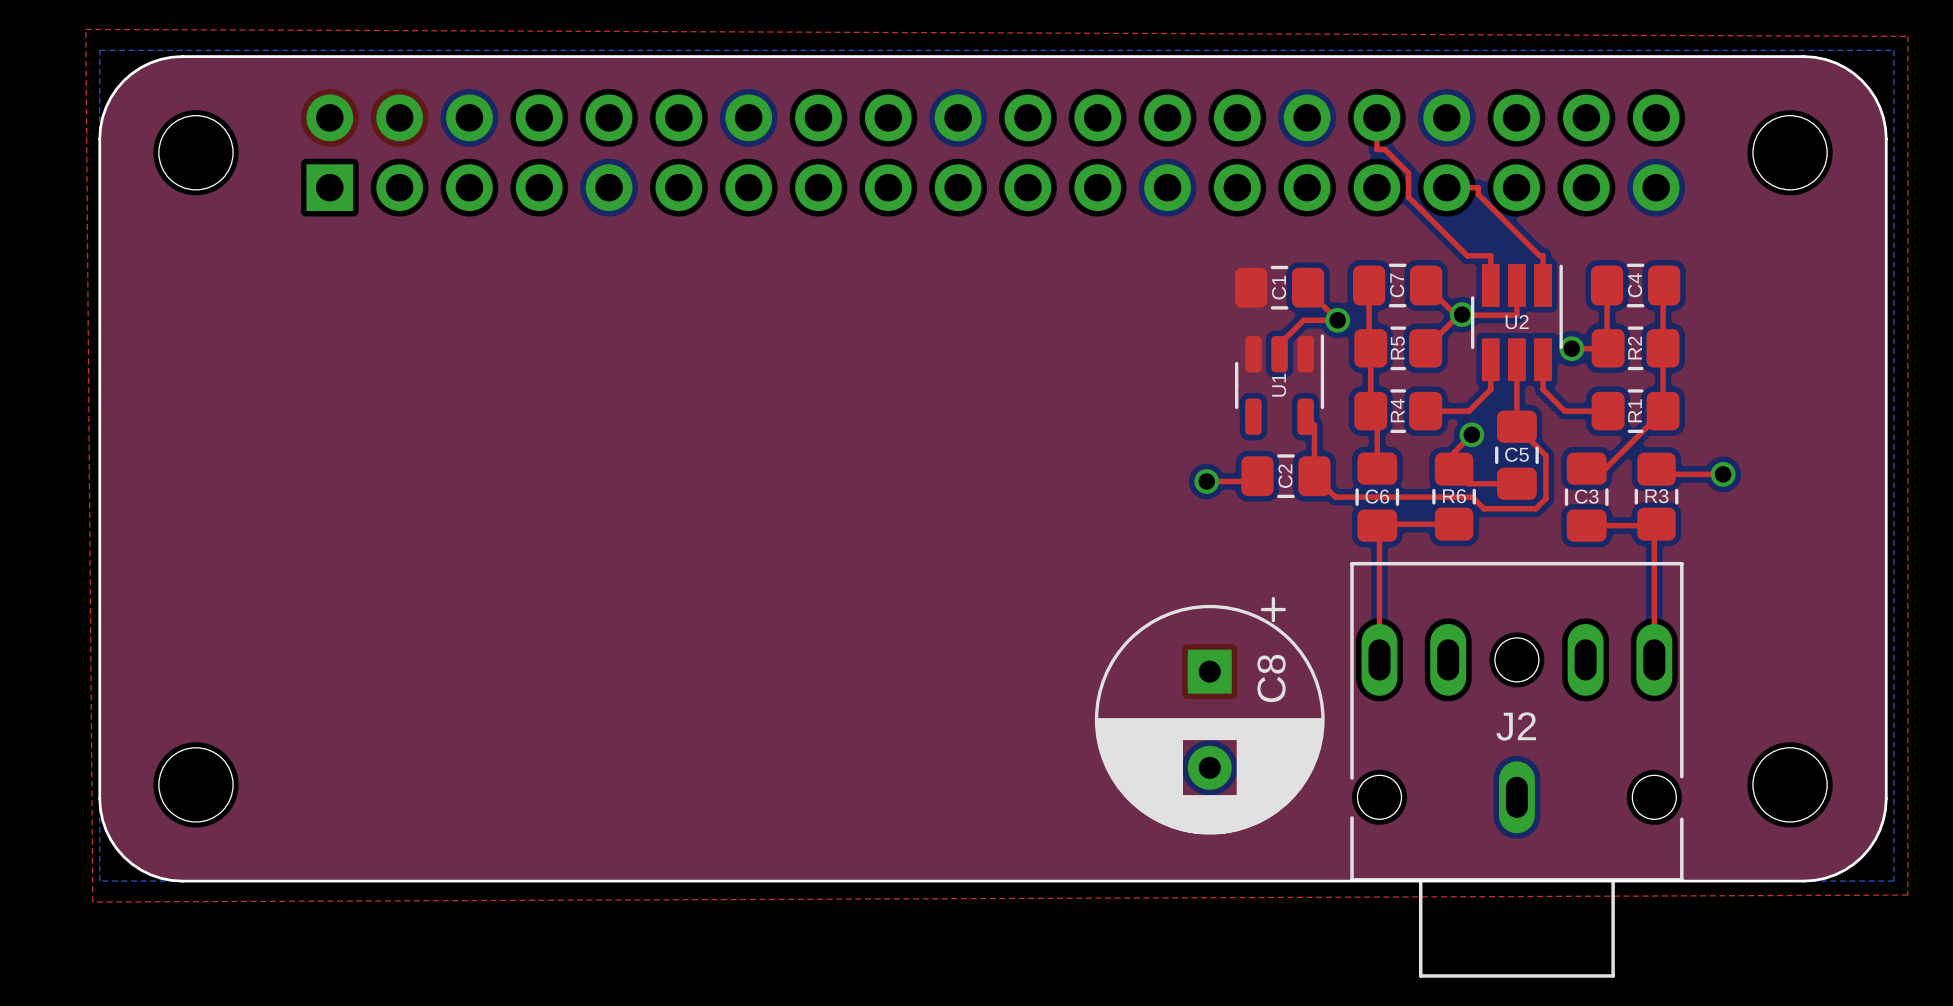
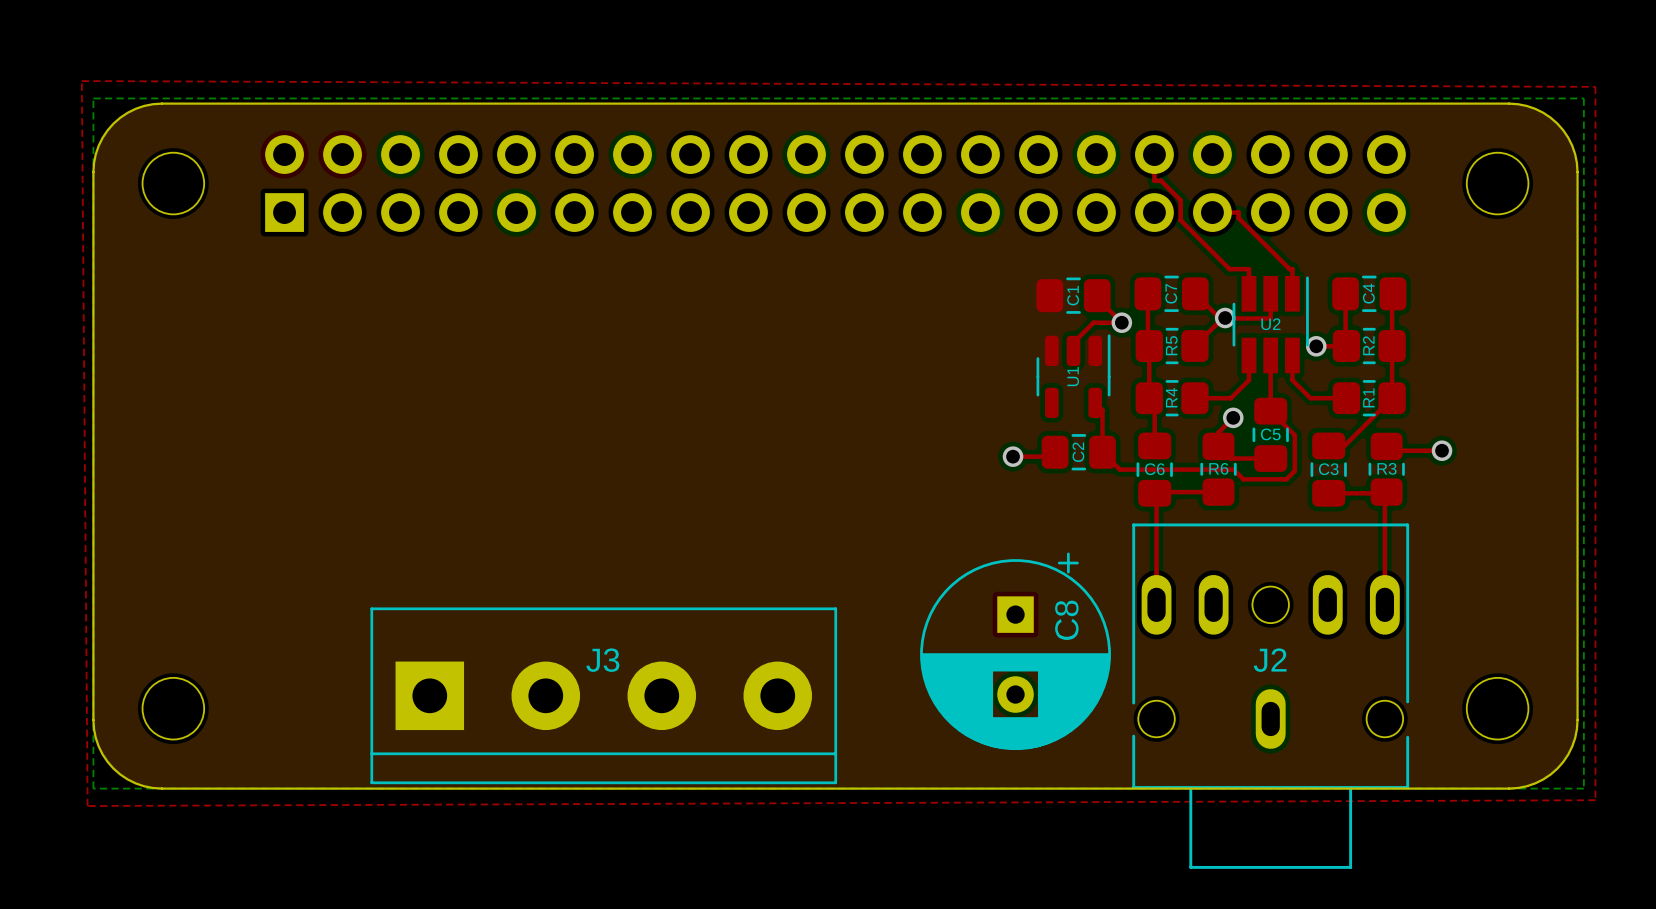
J3: none -> (603, 695)

